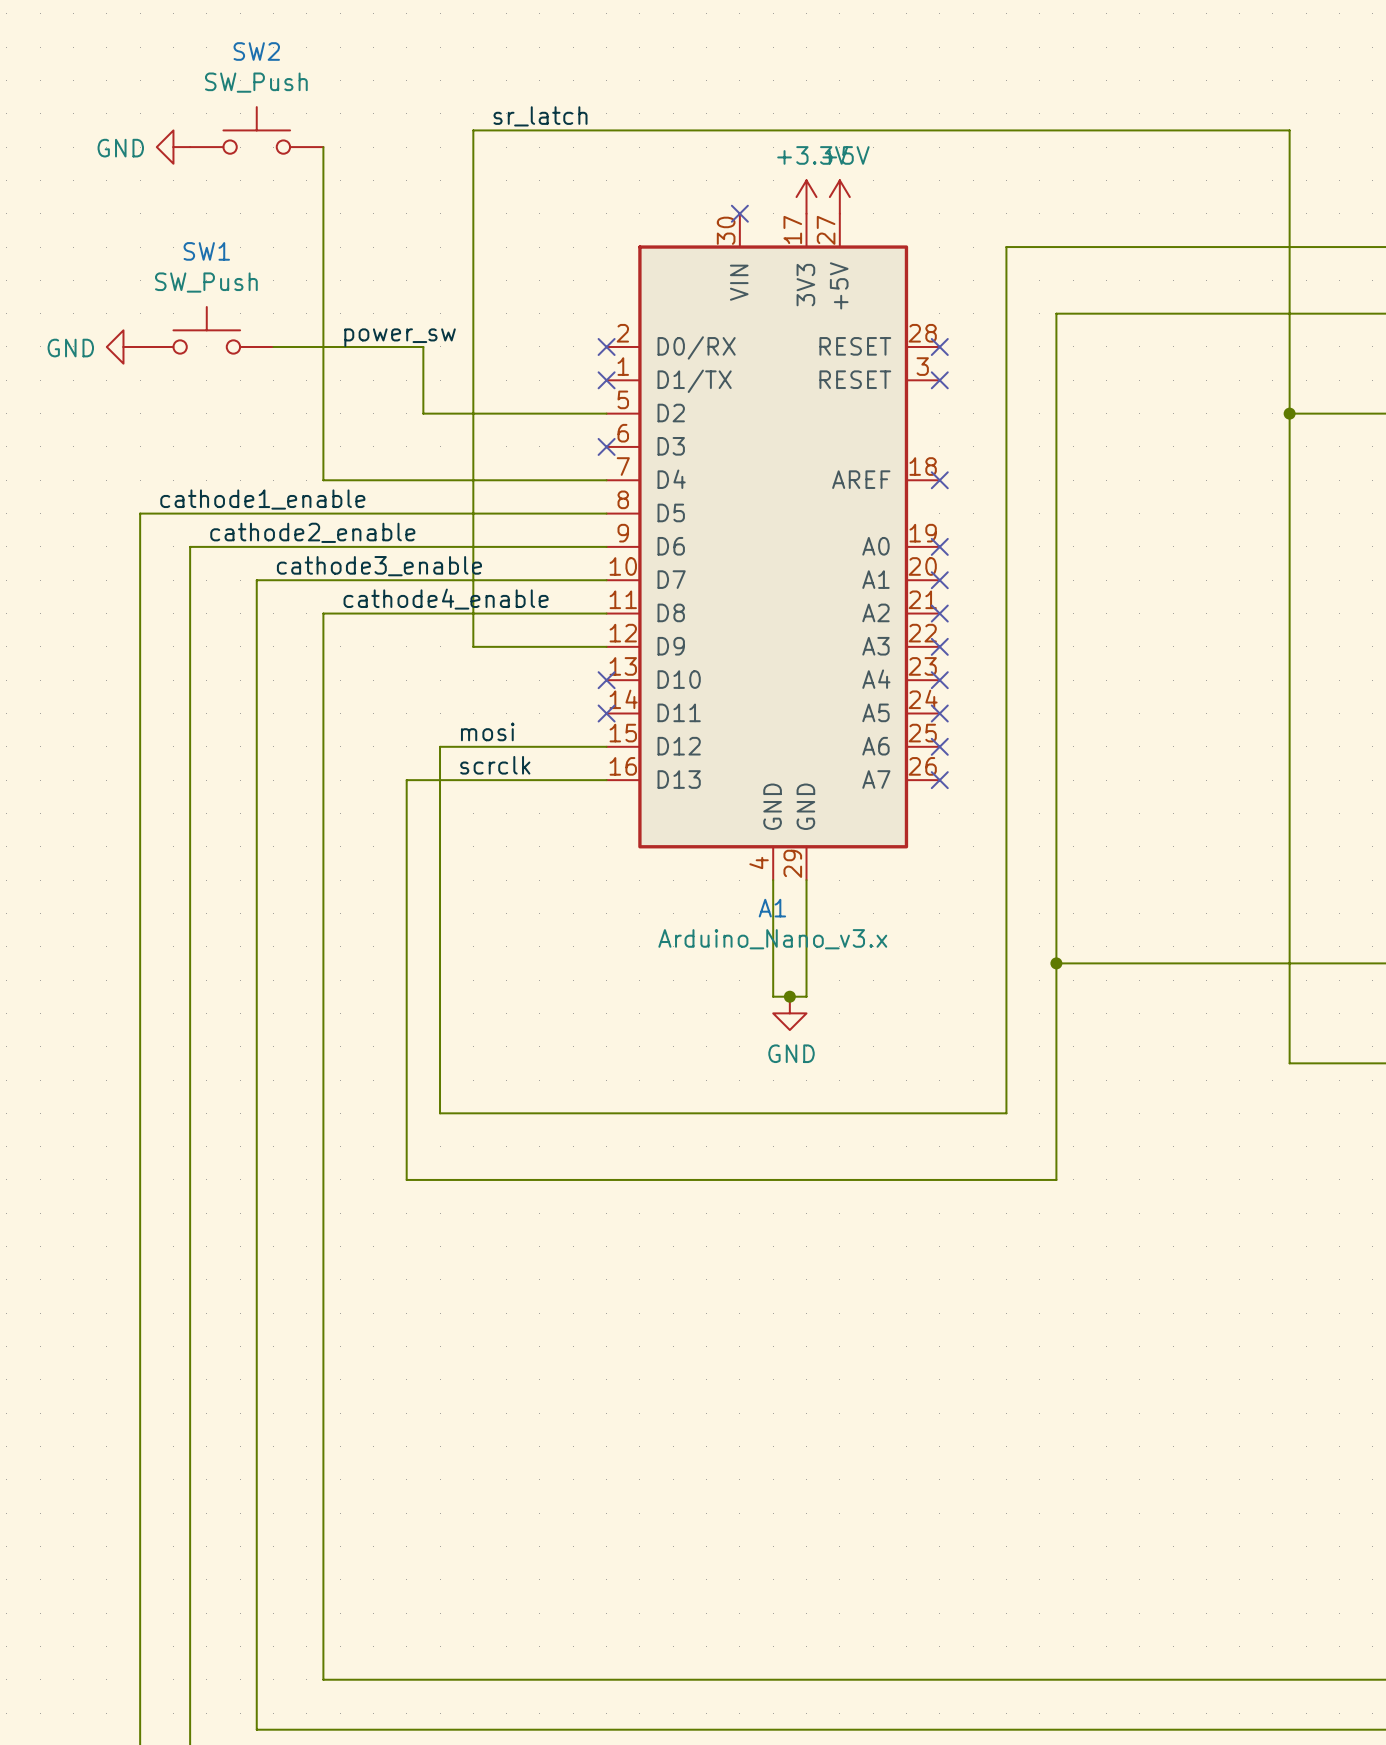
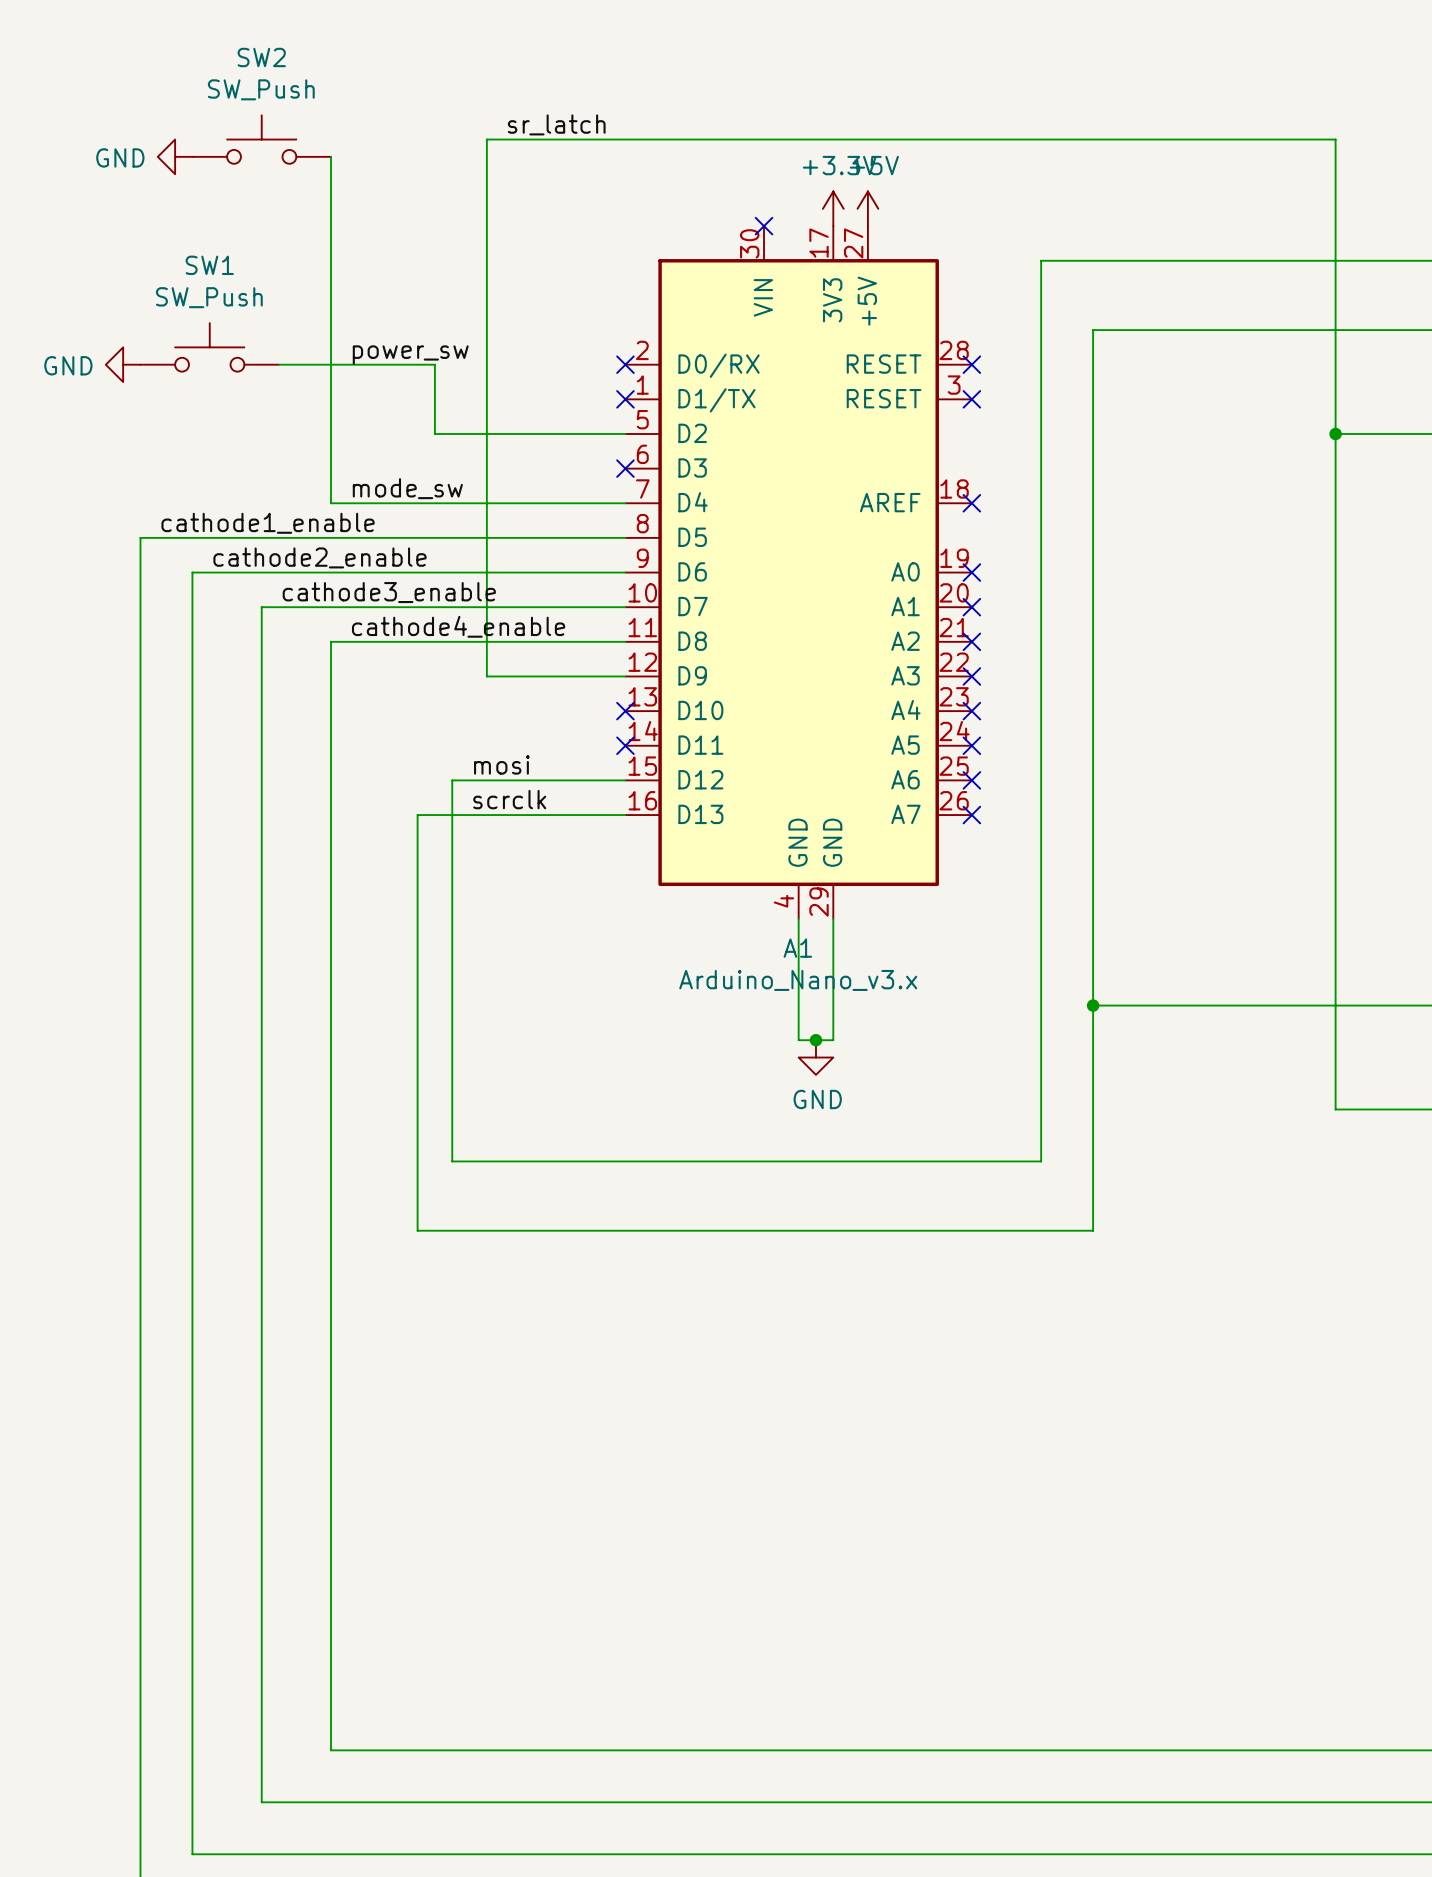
label: none -> mode_sw (407, 488)

